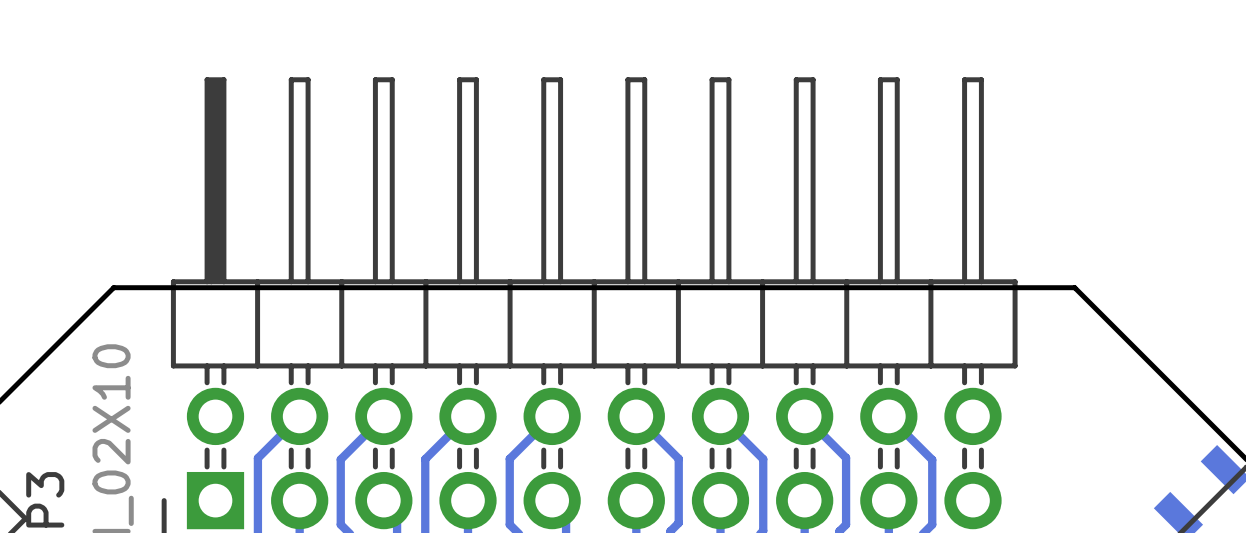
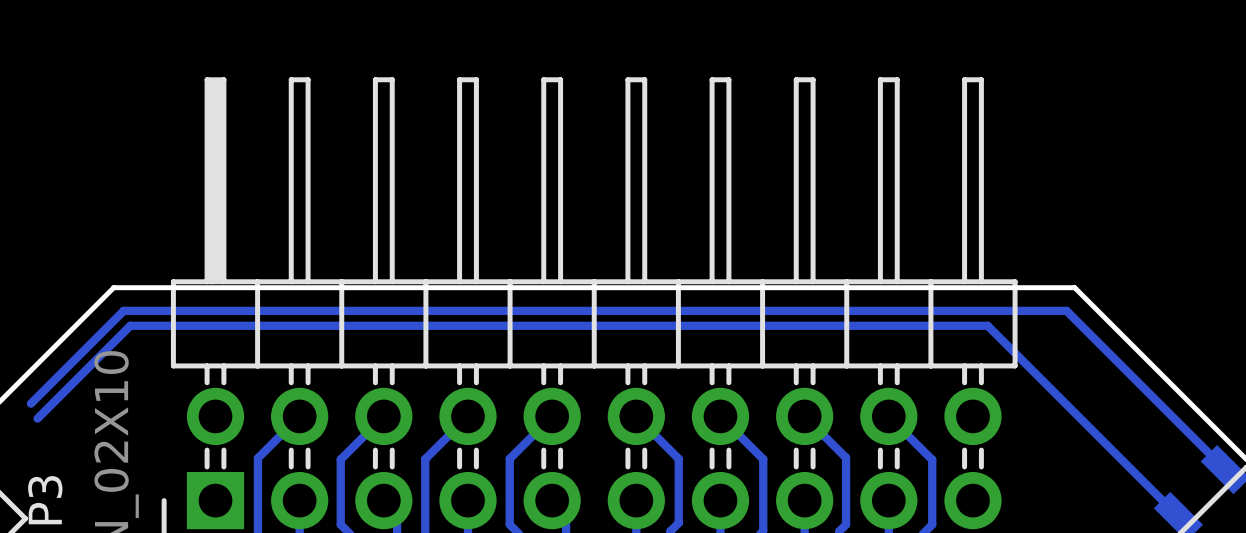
bottom track: none -> (30, 403) (123, 310) (1066, 310) (1225, 469)
bottom track: none -> (37, 418) (130, 325) (987, 325) (1178, 516)

